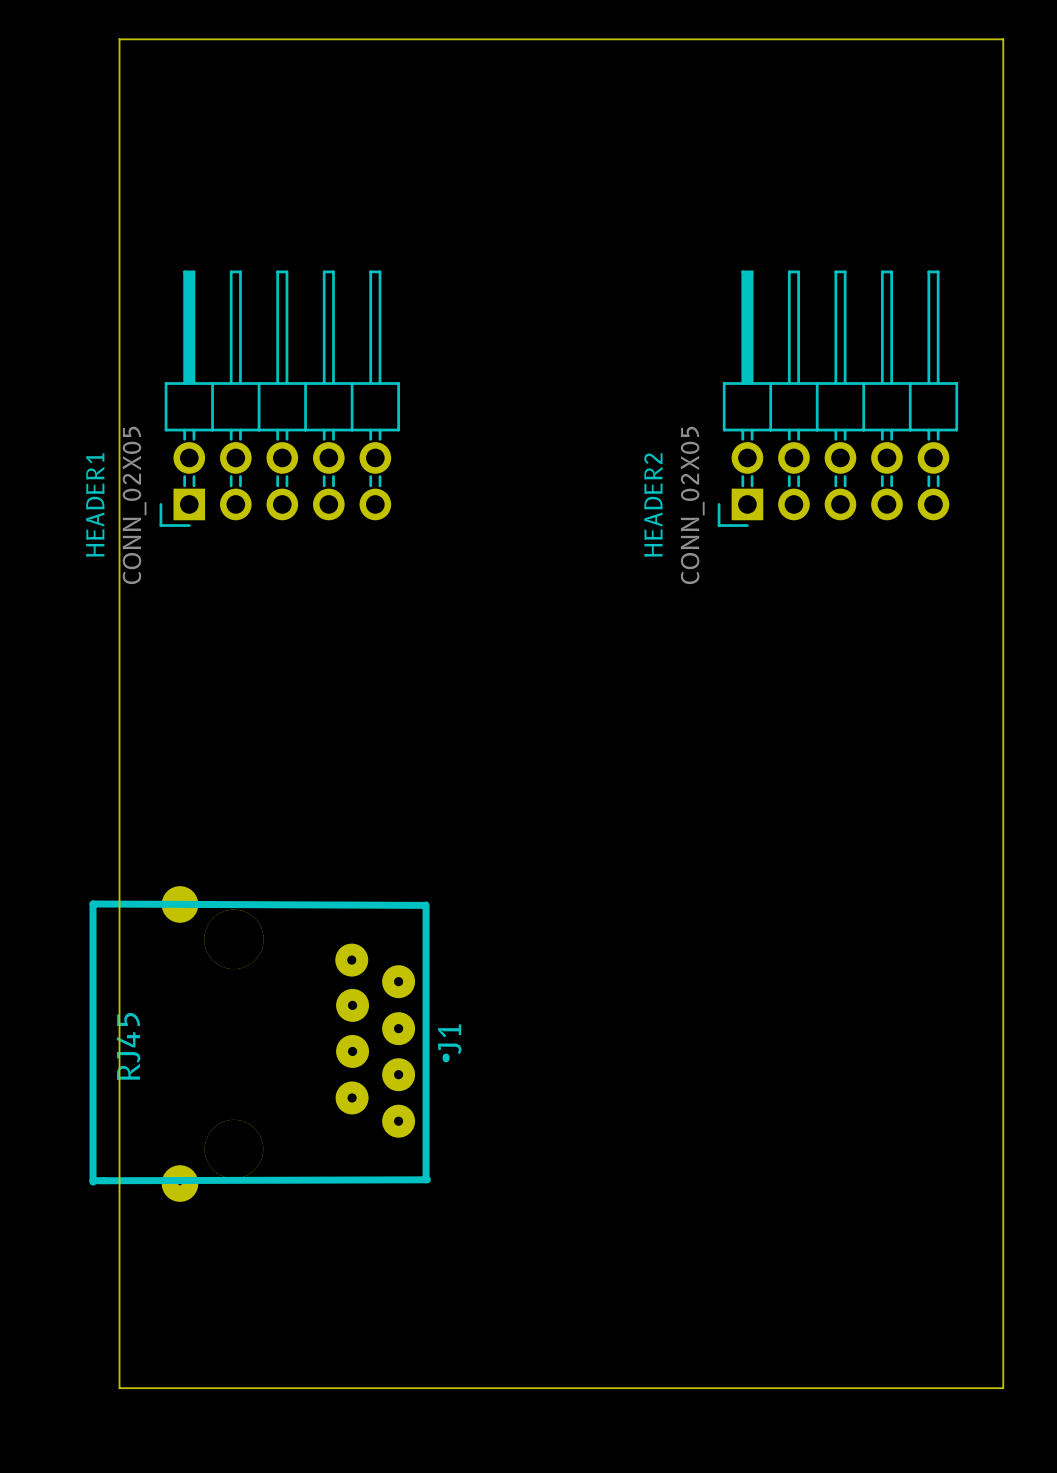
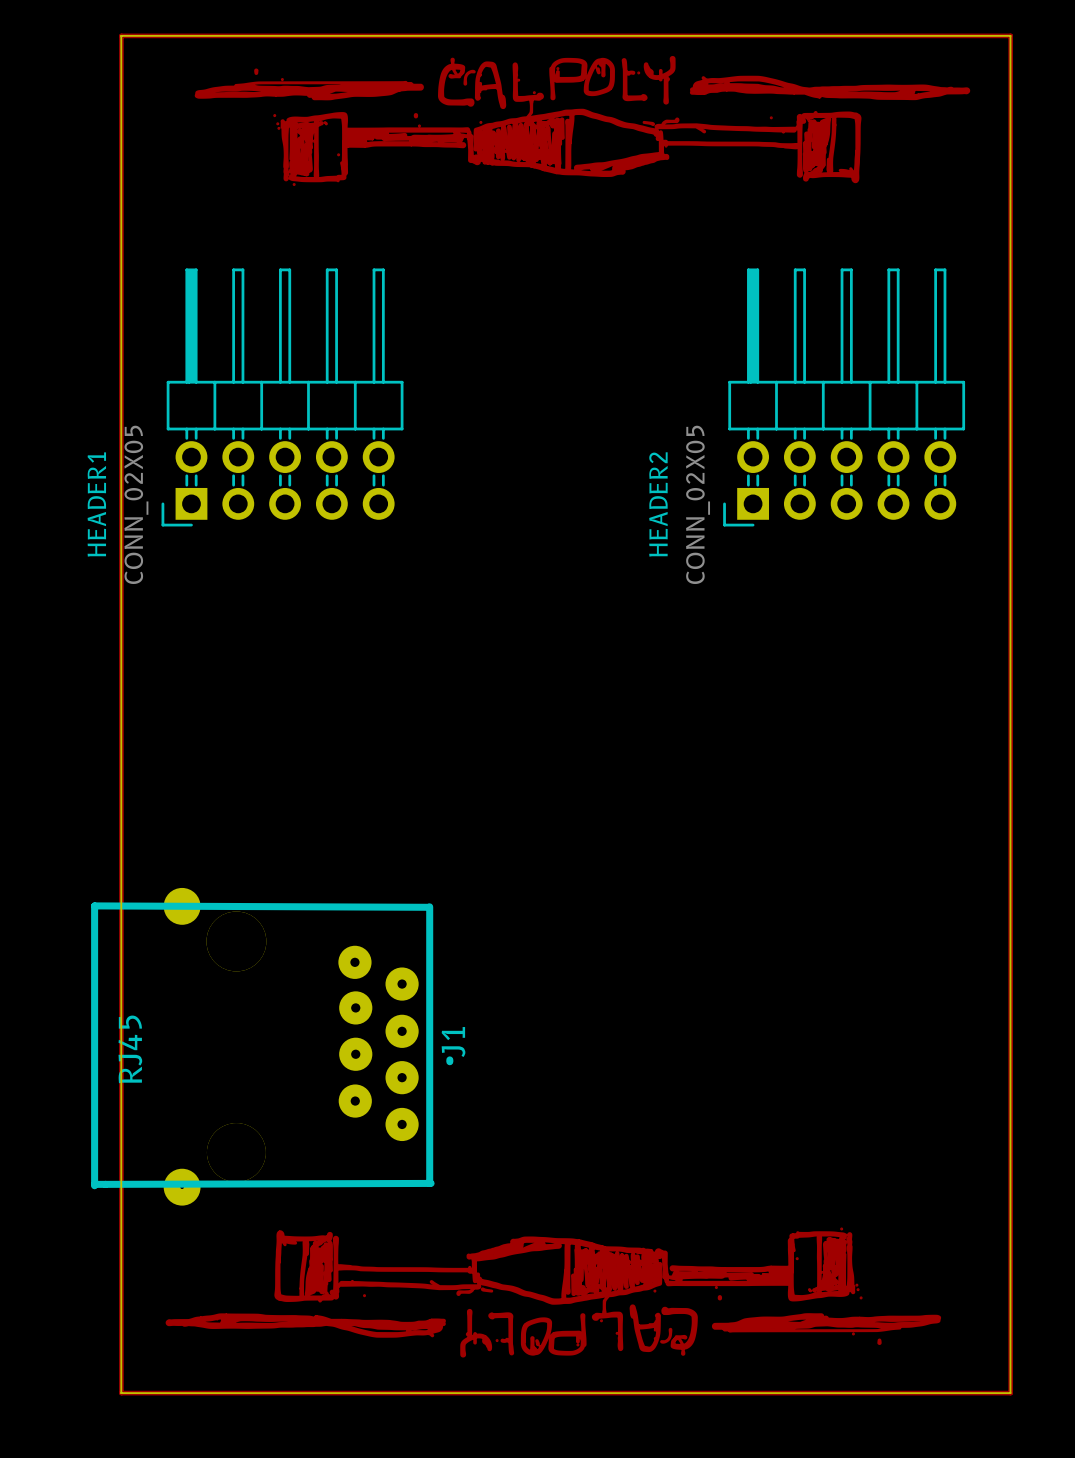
track: none -> (121, 35) (121, 1393) (1010, 1393) (1010, 35) (121, 35)
drawing: none -> [194, 56, 971, 187]
drawing: none -> [165, 1227, 942, 1358]

